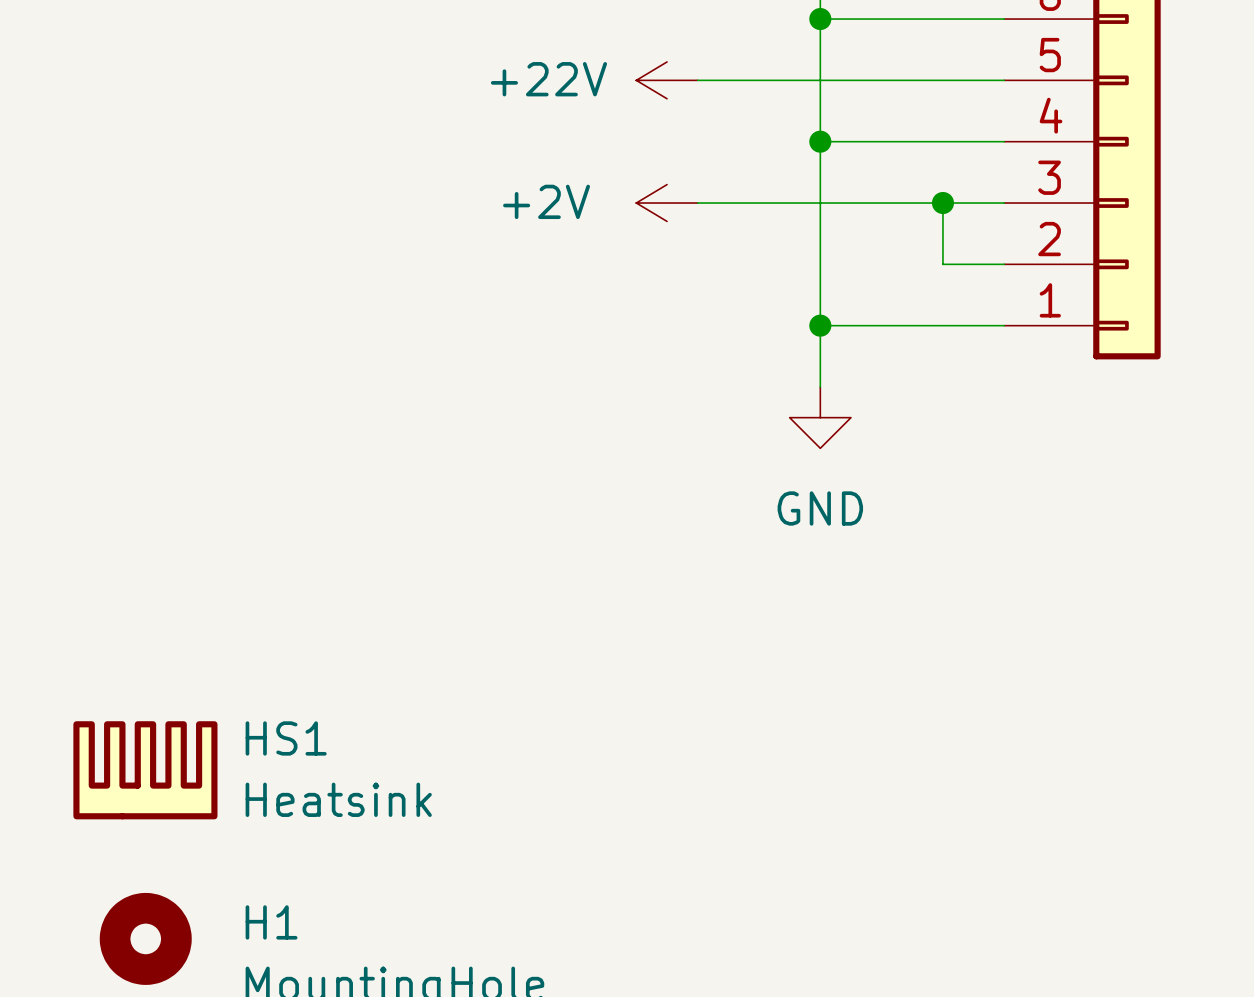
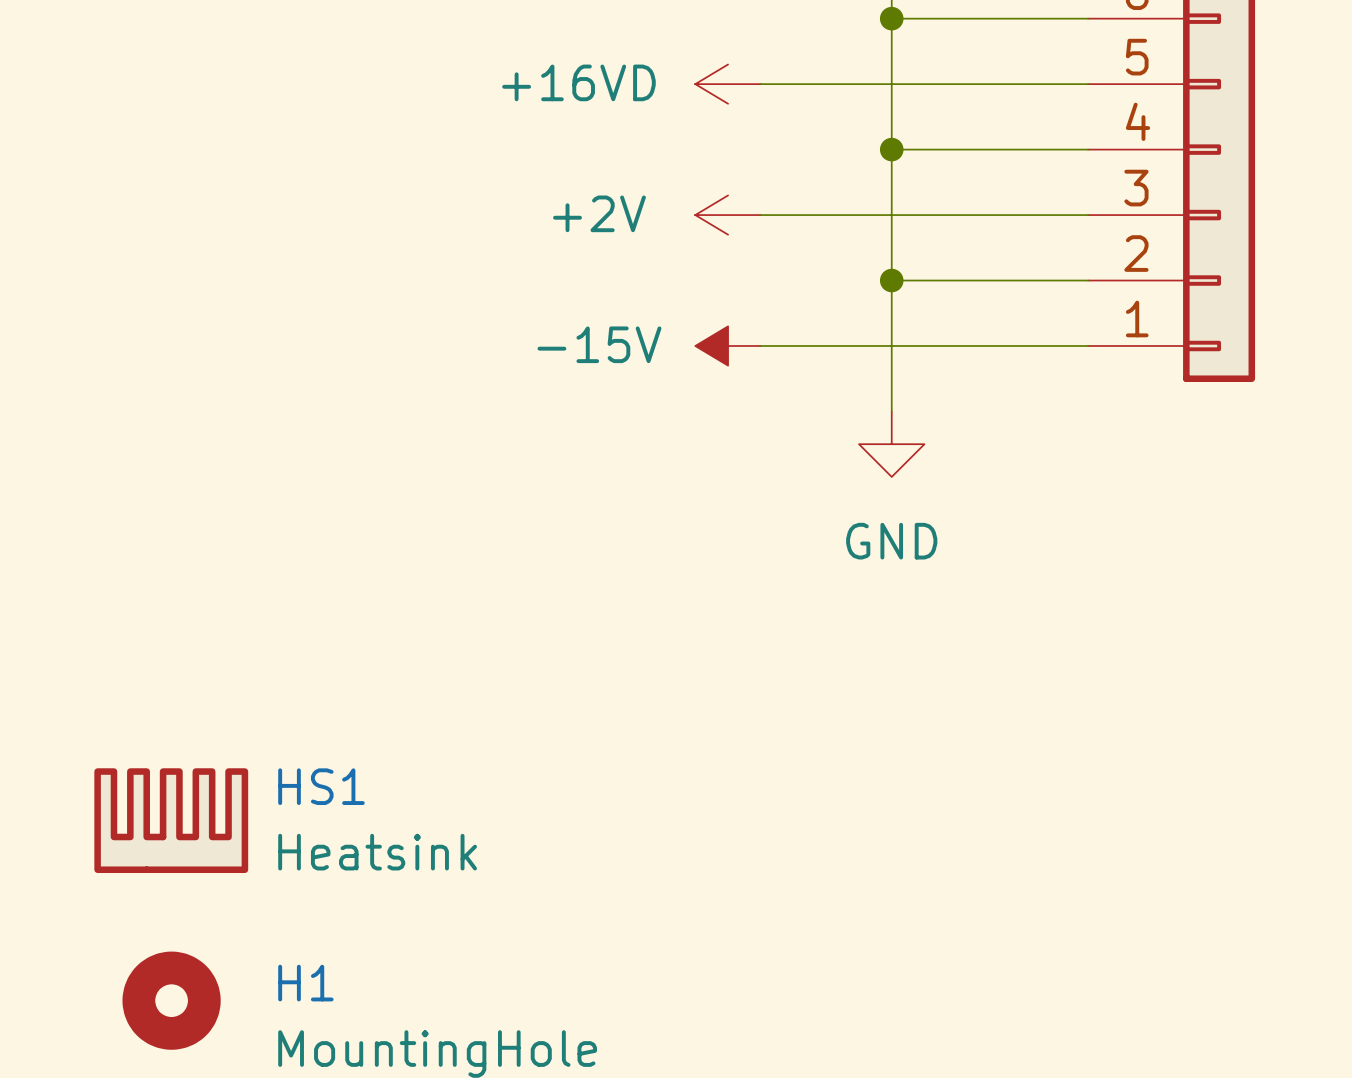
power symbol: +22V (667, 80) -> +16VD (728, 84)
wire: (942, 203) (942, 264) -> (891, 280) (1022, 280)
junction: (942, 203) -> none
power symbol: none -> -15V (728, 345)
wire: none -> (760, 345) (891, 345)
junction position: (820, 325) -> (891, 280)

